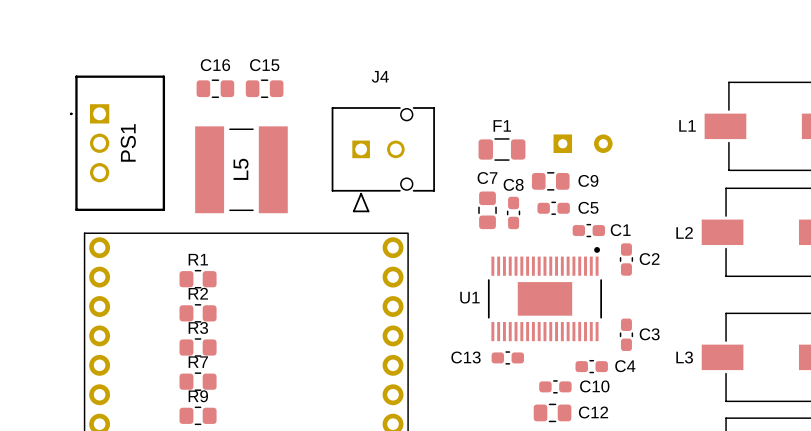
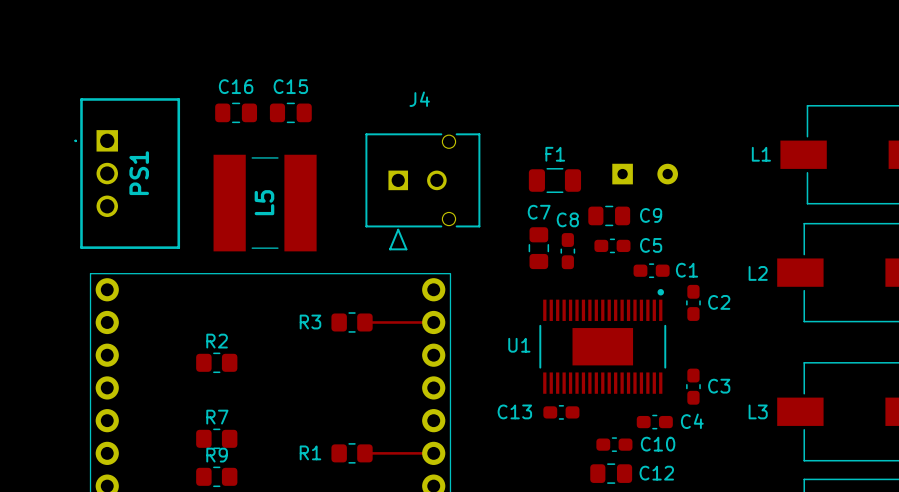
R1 name position: R1 (198, 259) -> R1 (310, 452)
track: none -> (364, 322) (433, 322)
R1 position: (198, 279) -> (352, 453)
R3 name position: R3 (198, 327) -> R3 (310, 322)
R3 position: (198, 347) -> (352, 322)
track: none -> (364, 453) (433, 453)

